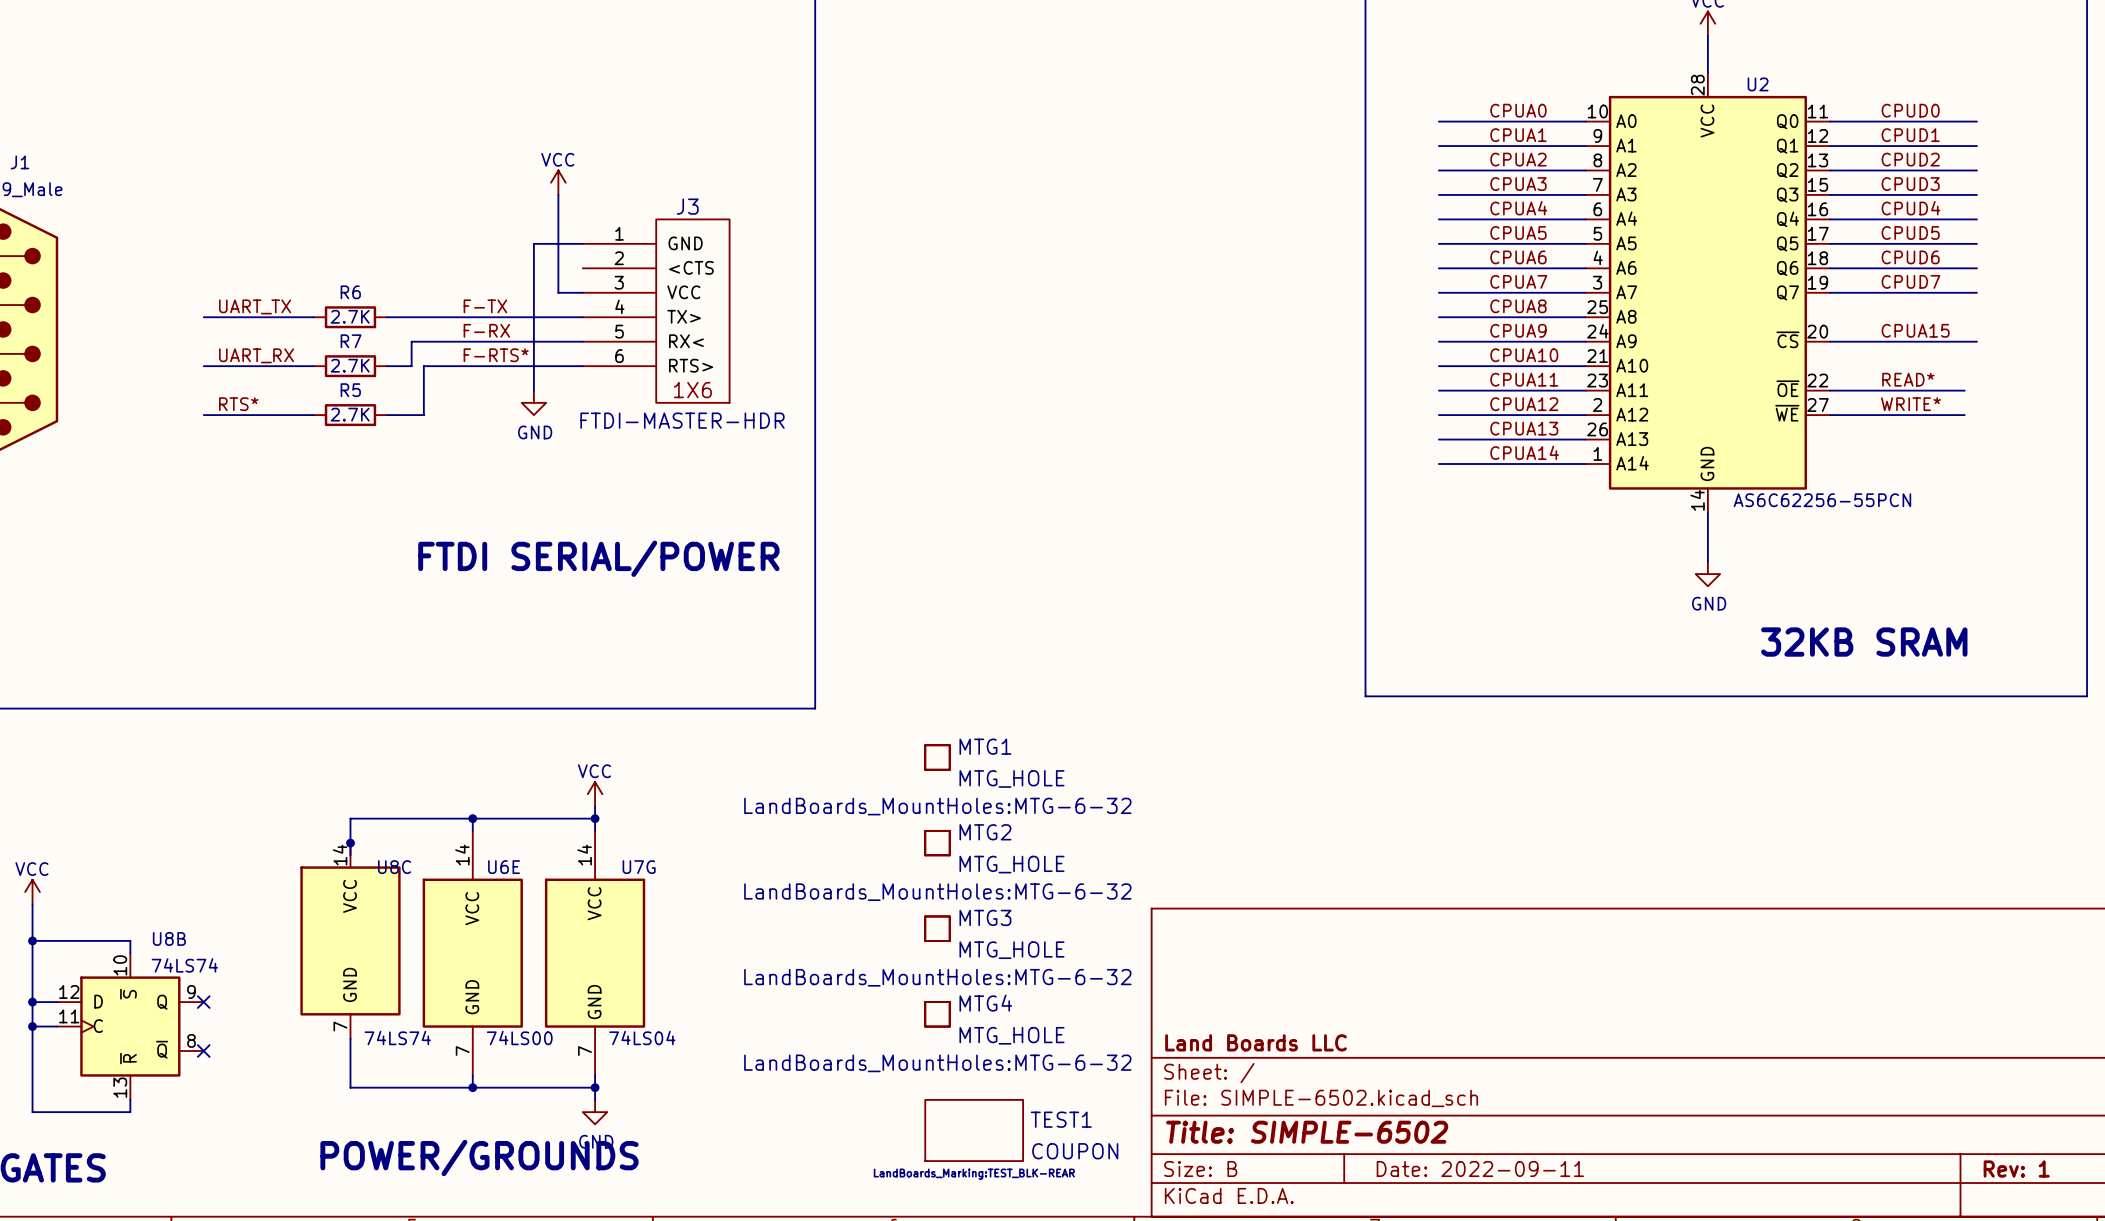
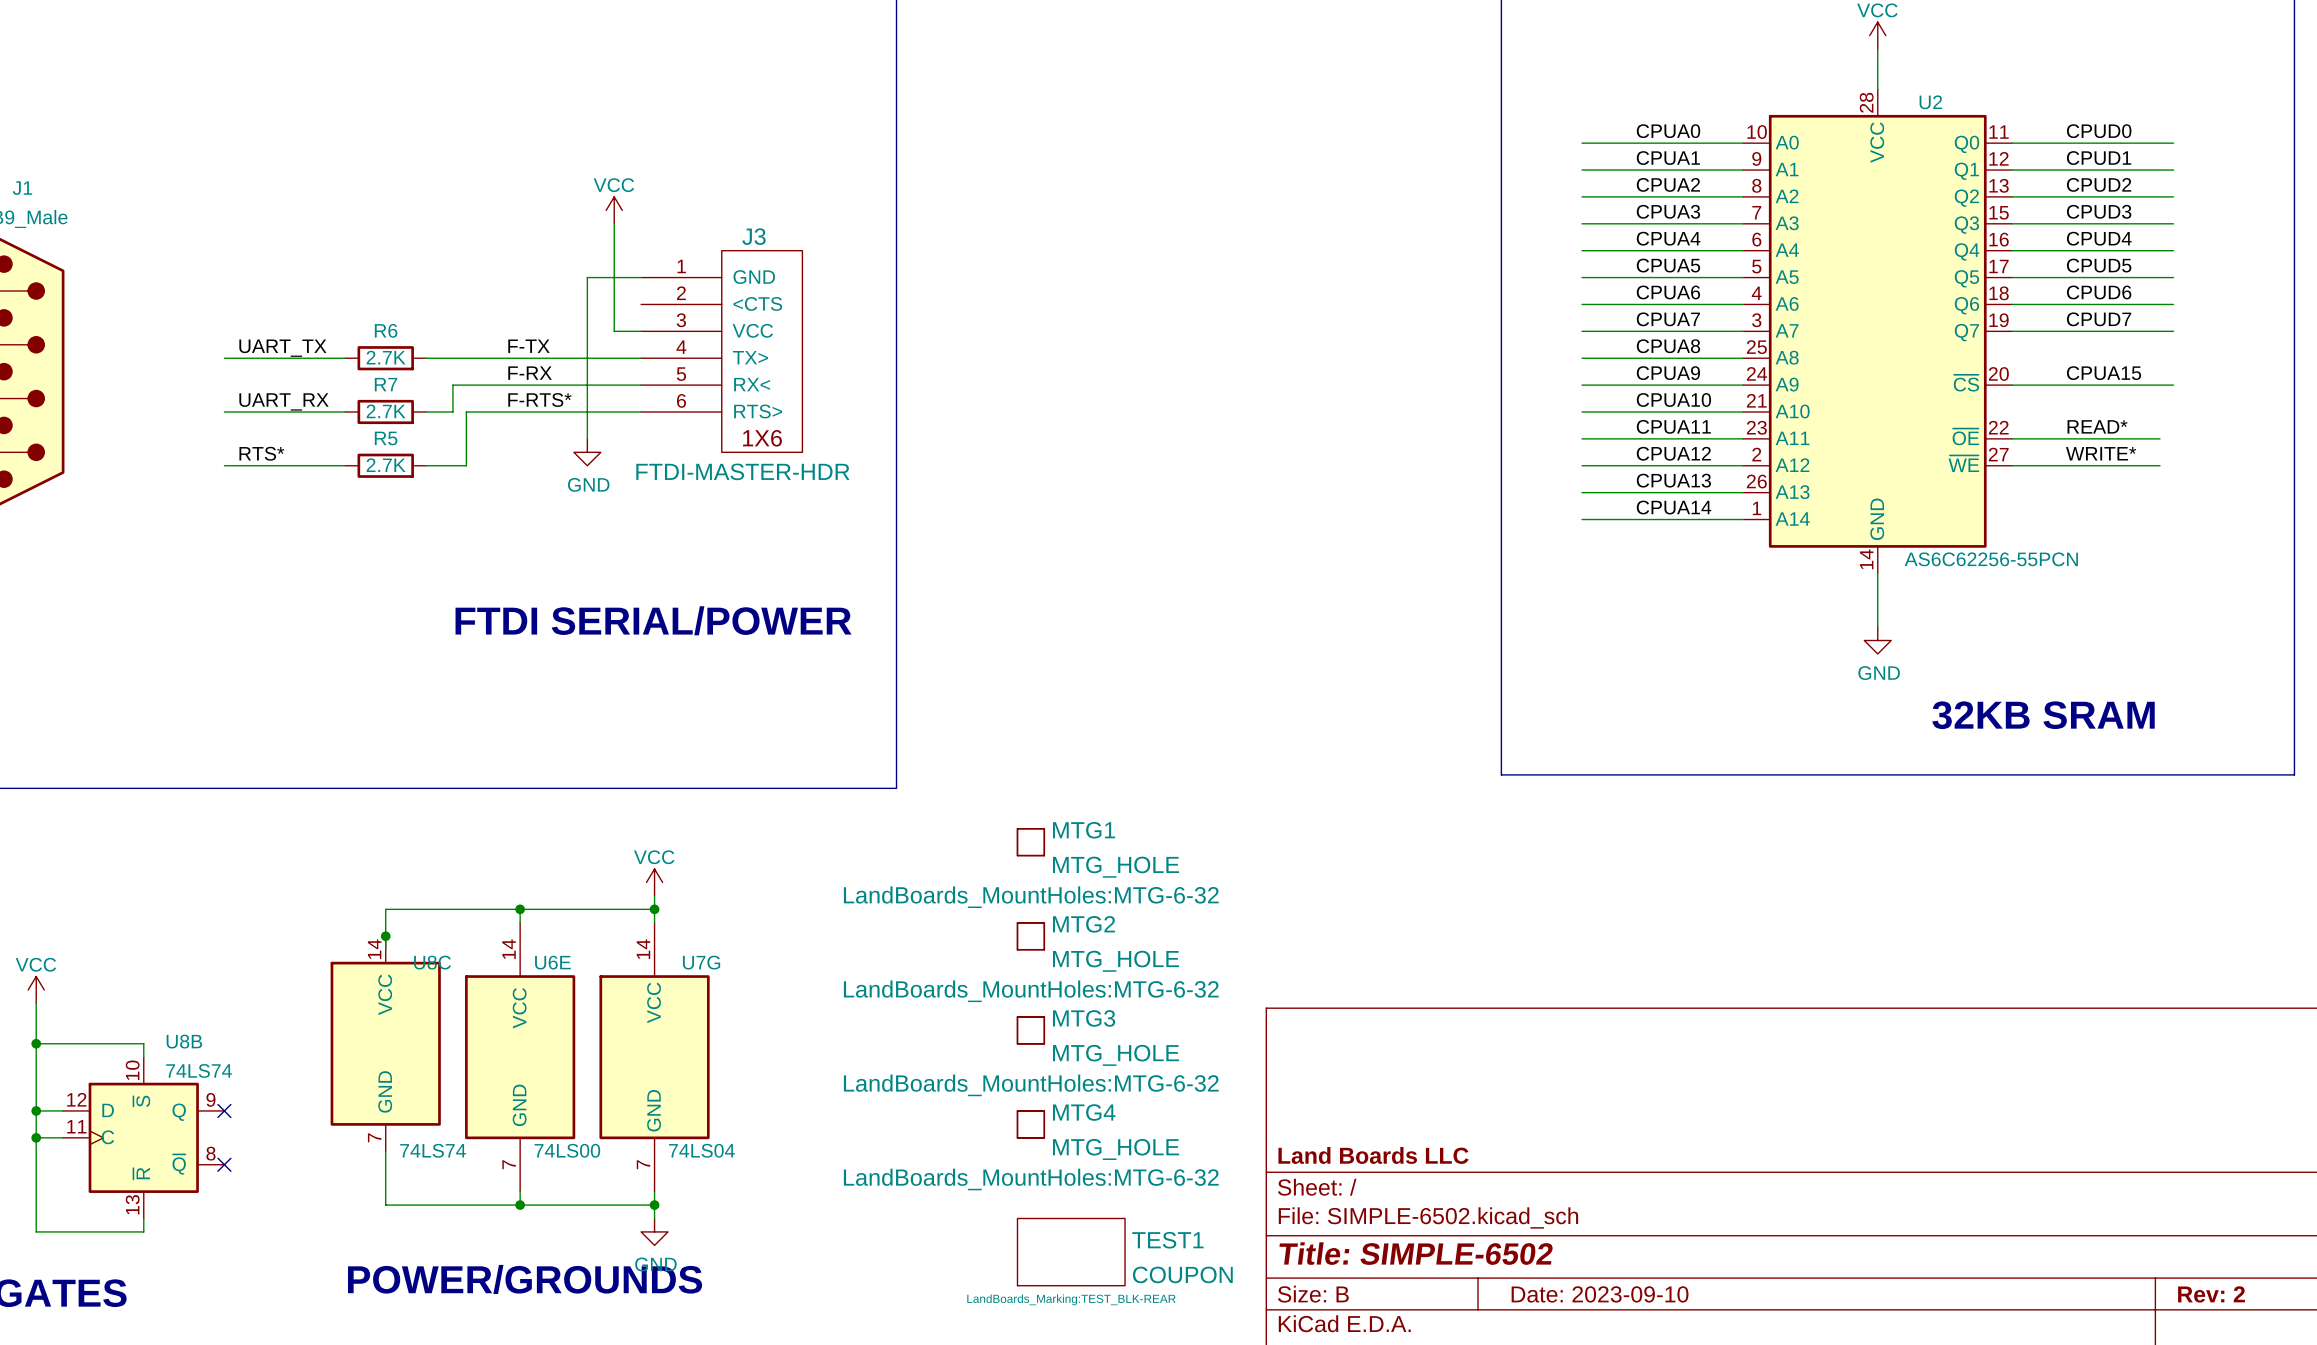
title block: Date: 2022-09-11 (1480, 1168) -> Date: 2023-09-10 (1600, 1294)
title block: Rev: 1 (2016, 1168) -> Rev: 2 (2211, 1294)

